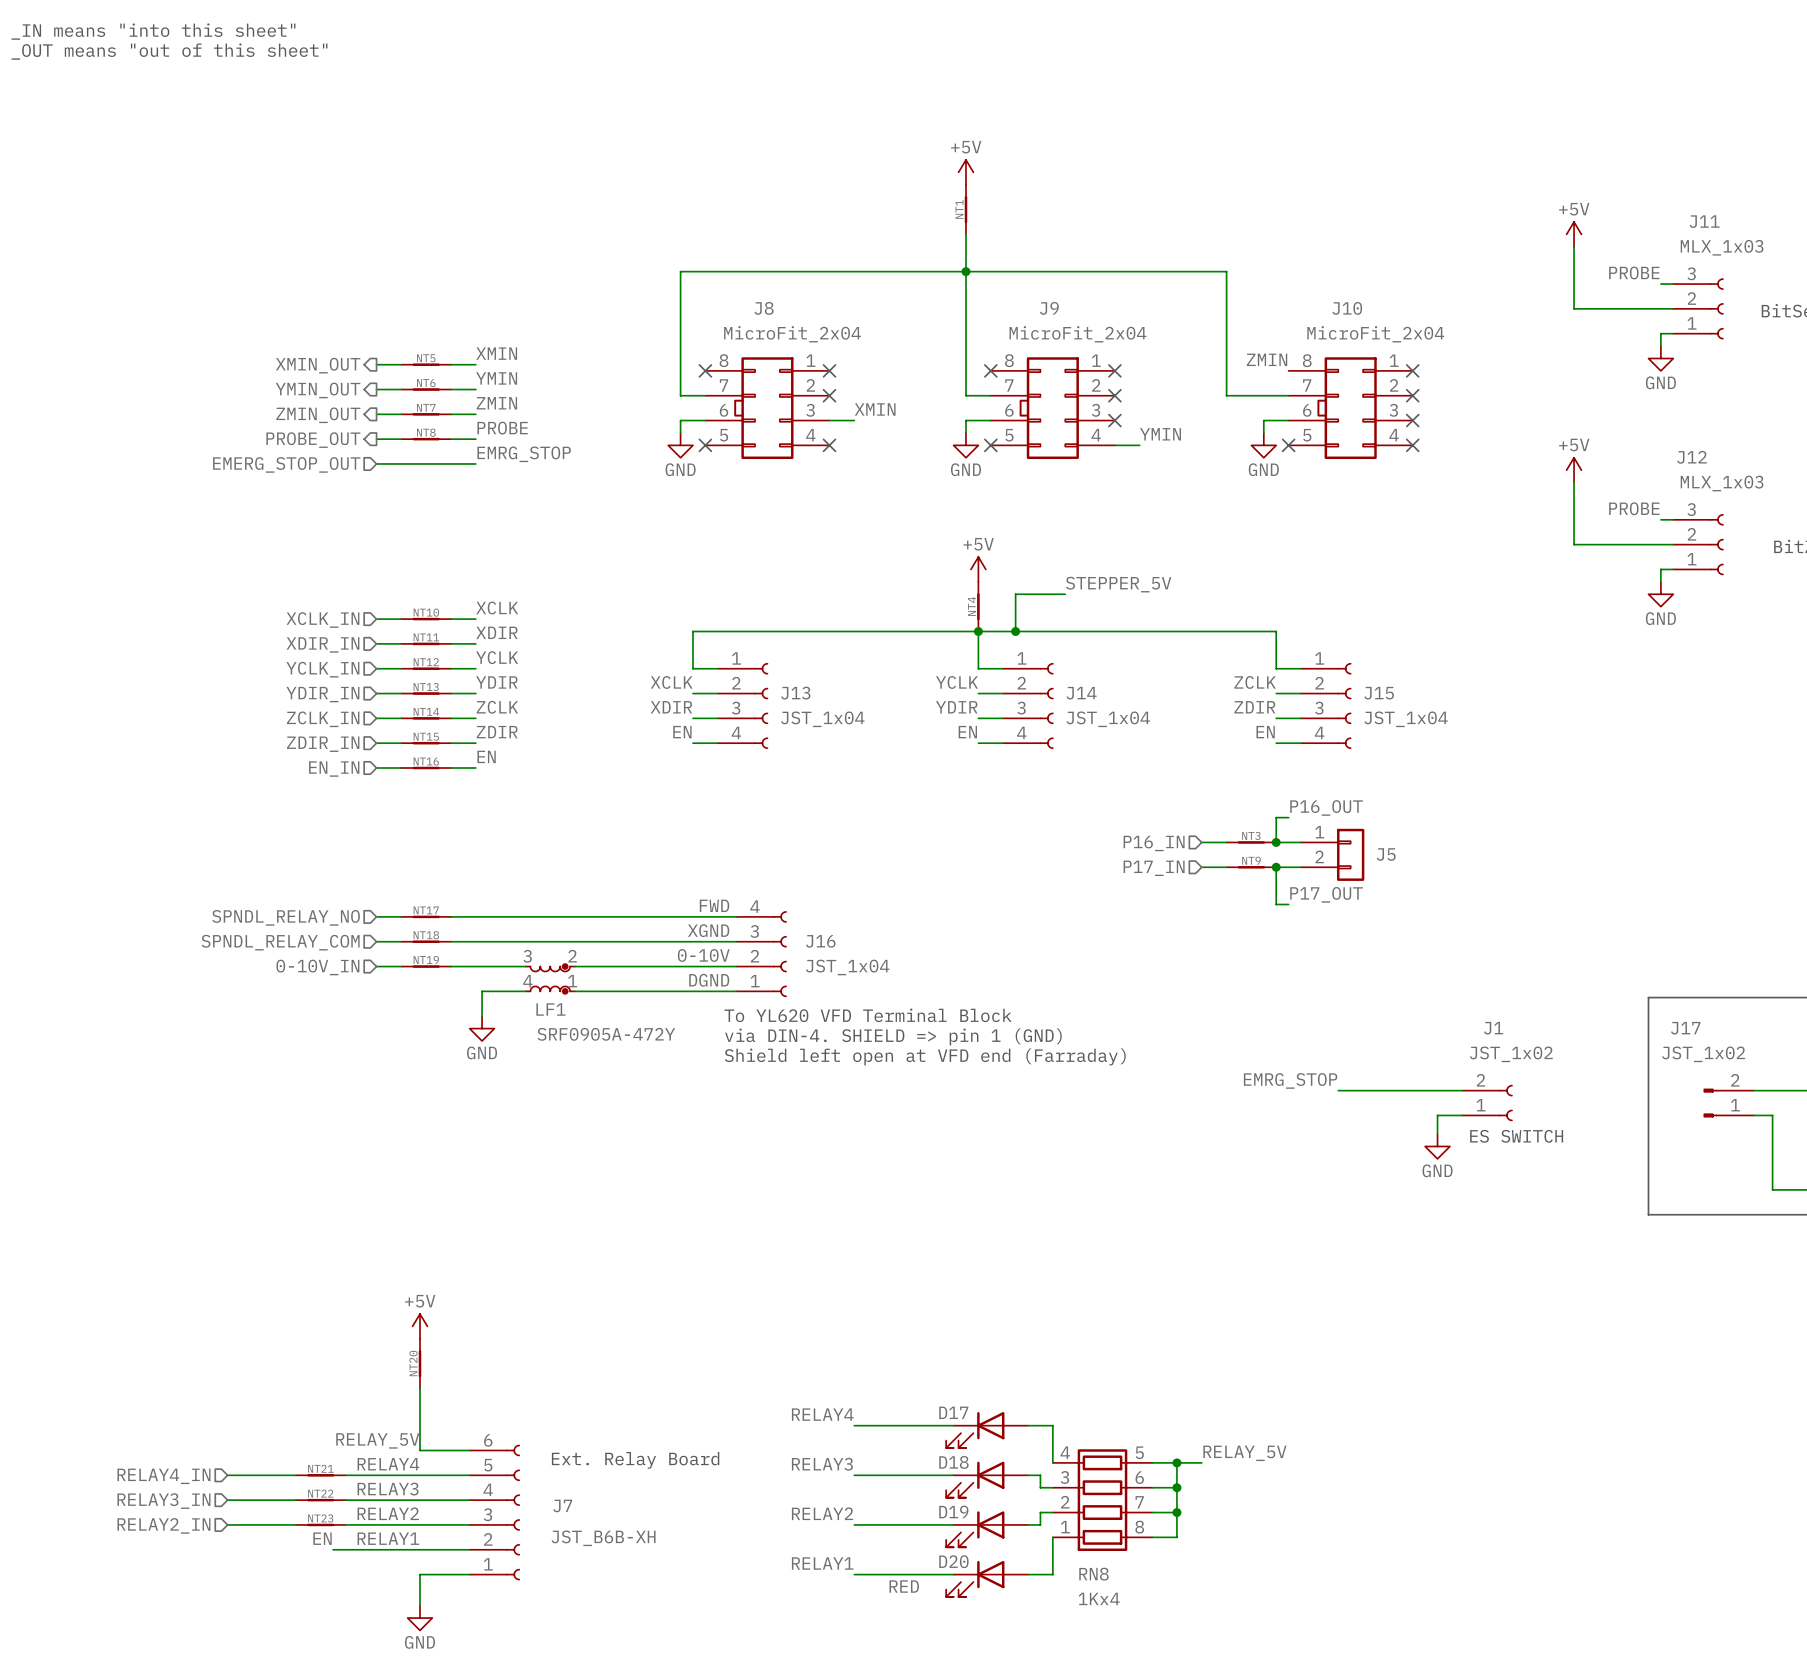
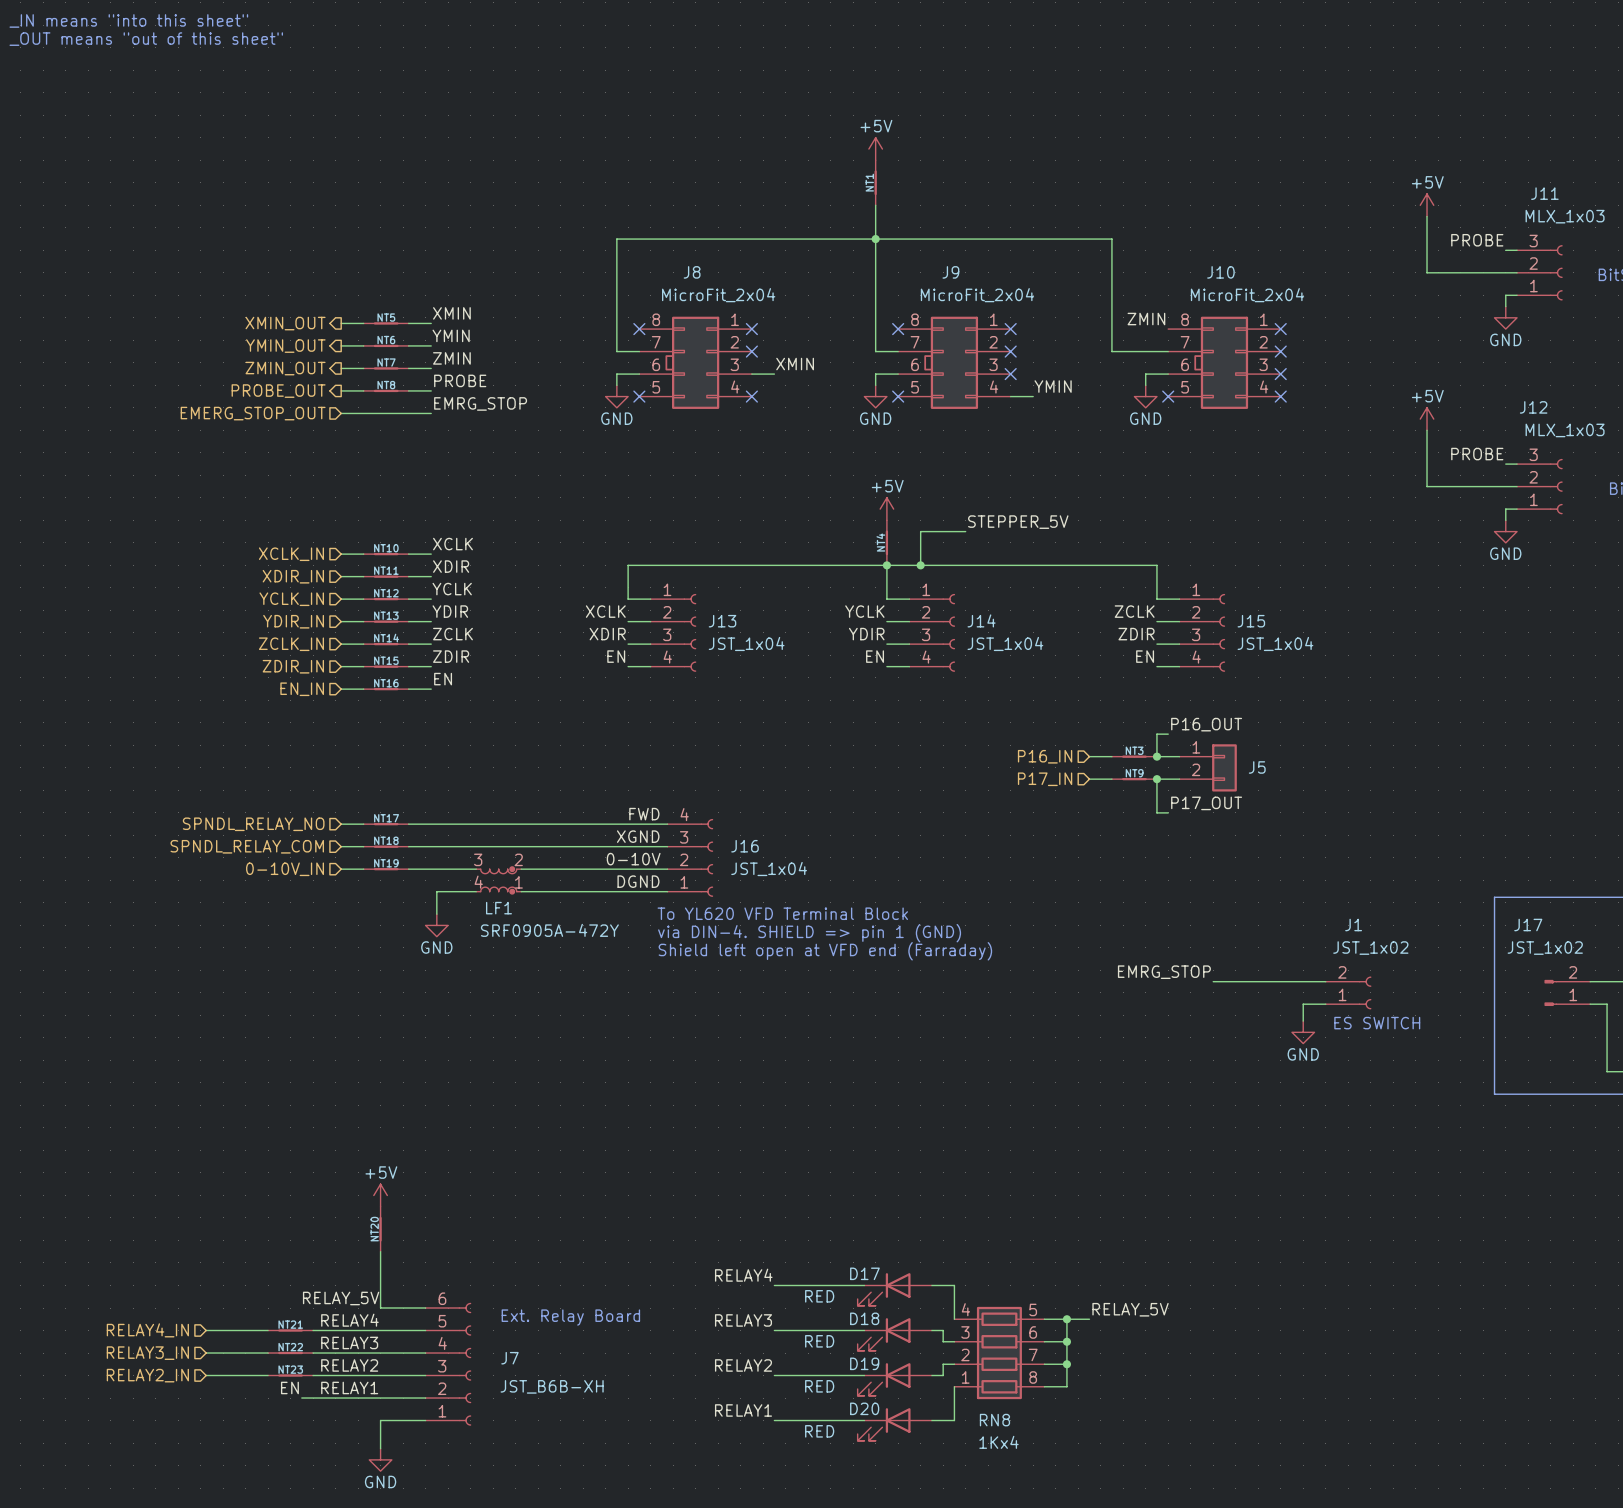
D17 value: none -> RED (819, 1296)
D18 value: none -> RED (819, 1341)
D19 value: none -> RED (819, 1386)

